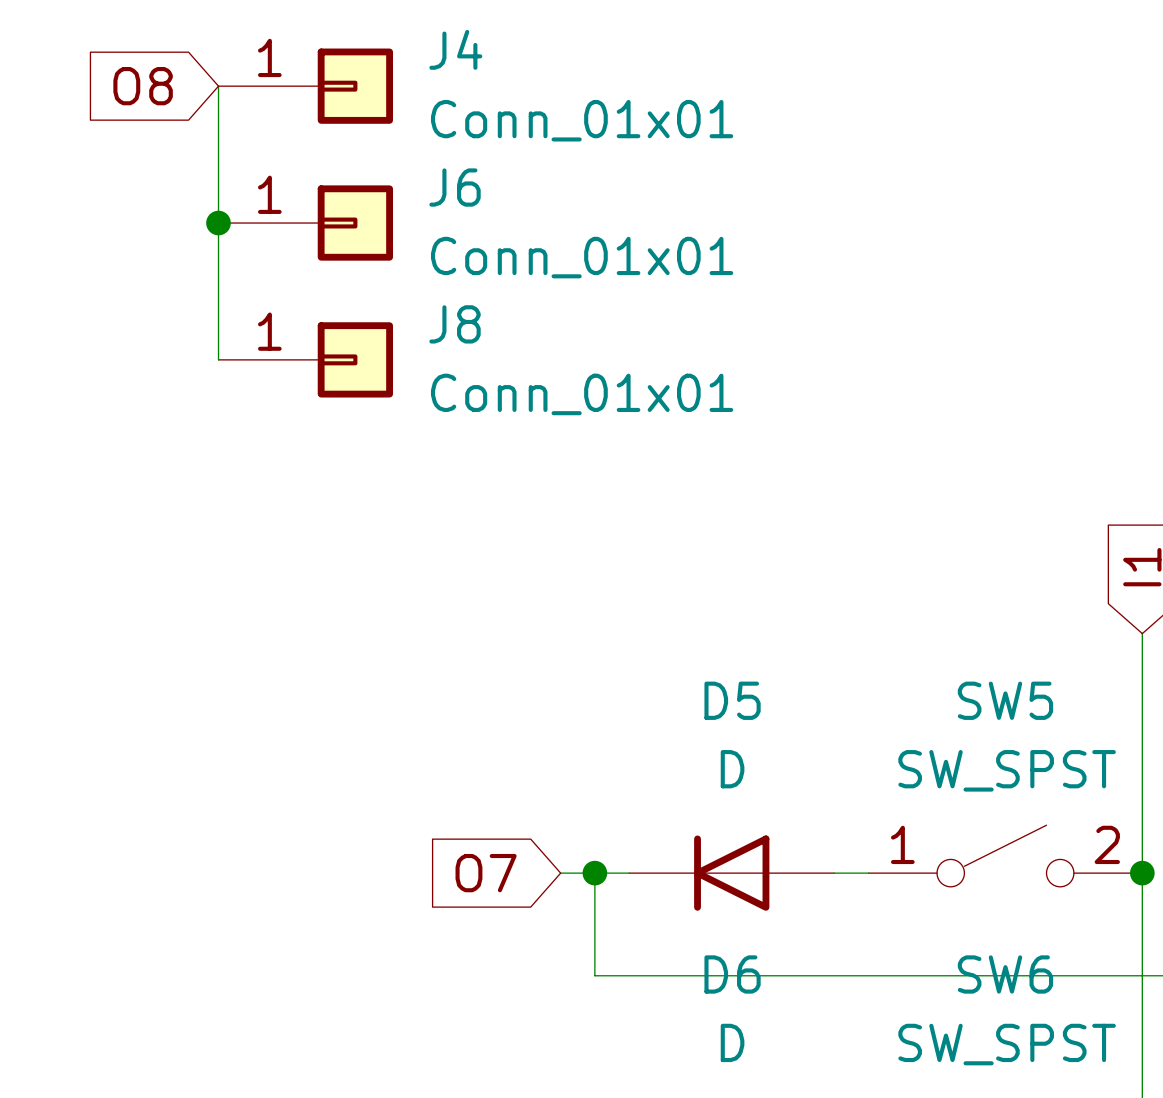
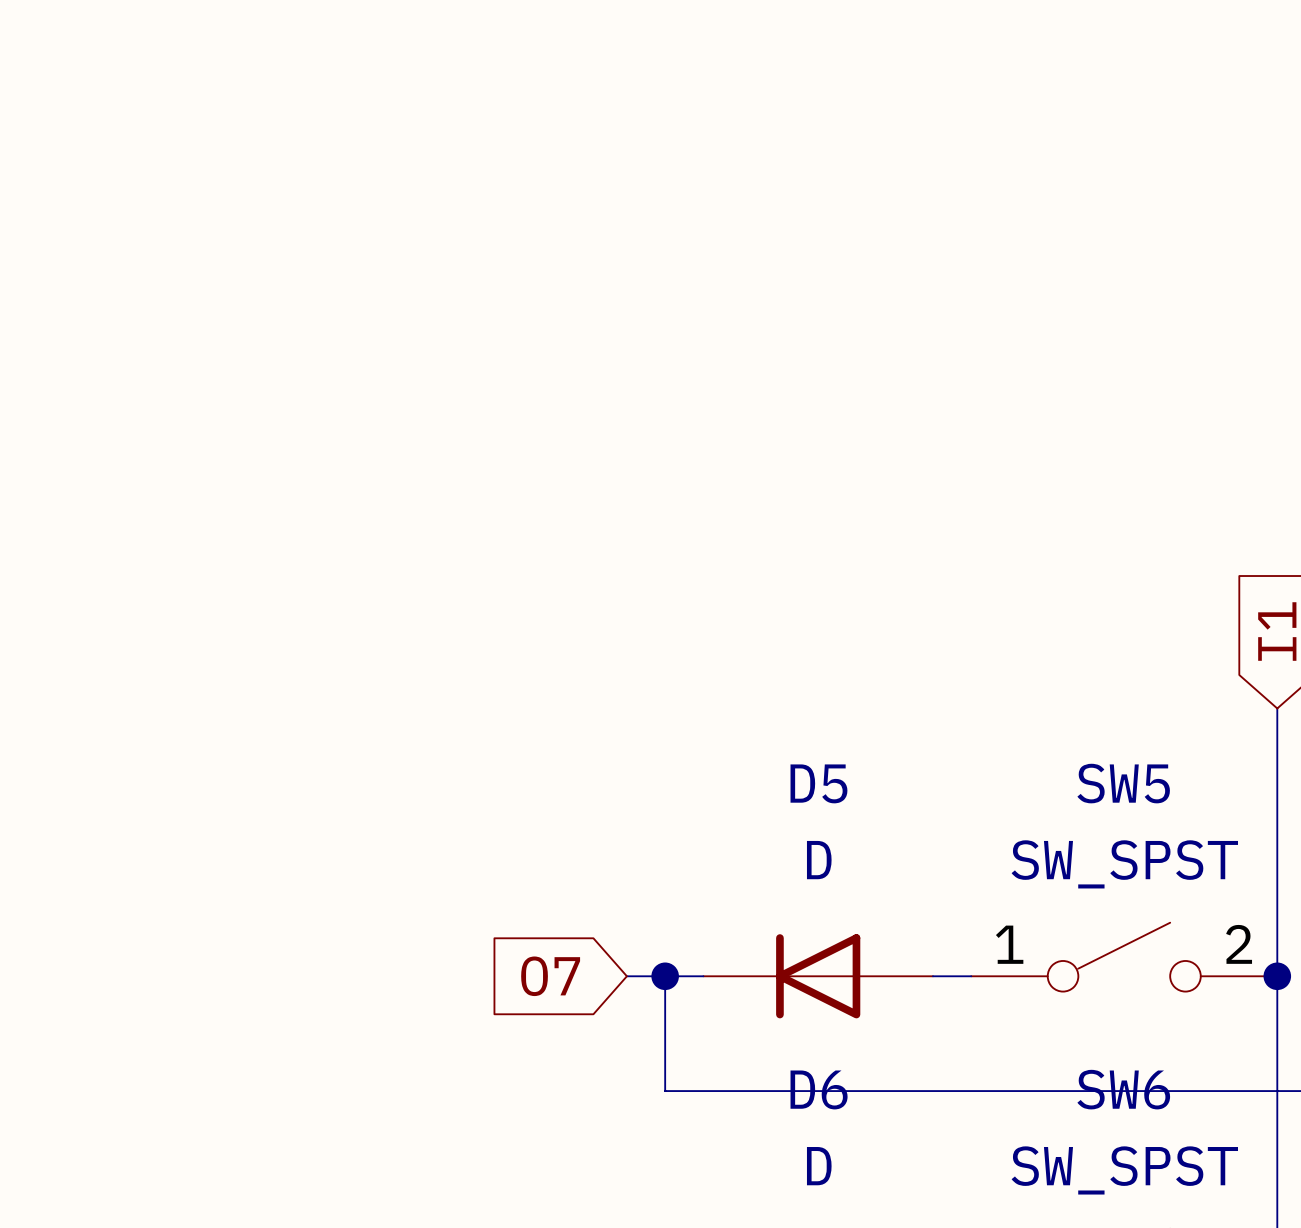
global label: O8 (143, 86) -> none
wire: (218, 86) (218, 359) -> none
J4: Conn_01x01 (305, 86) -> none
junction: (218, 223) -> none
J6: Conn_01x01 (305, 223) -> none
J8: Conn_01x01 (305, 359) -> none

